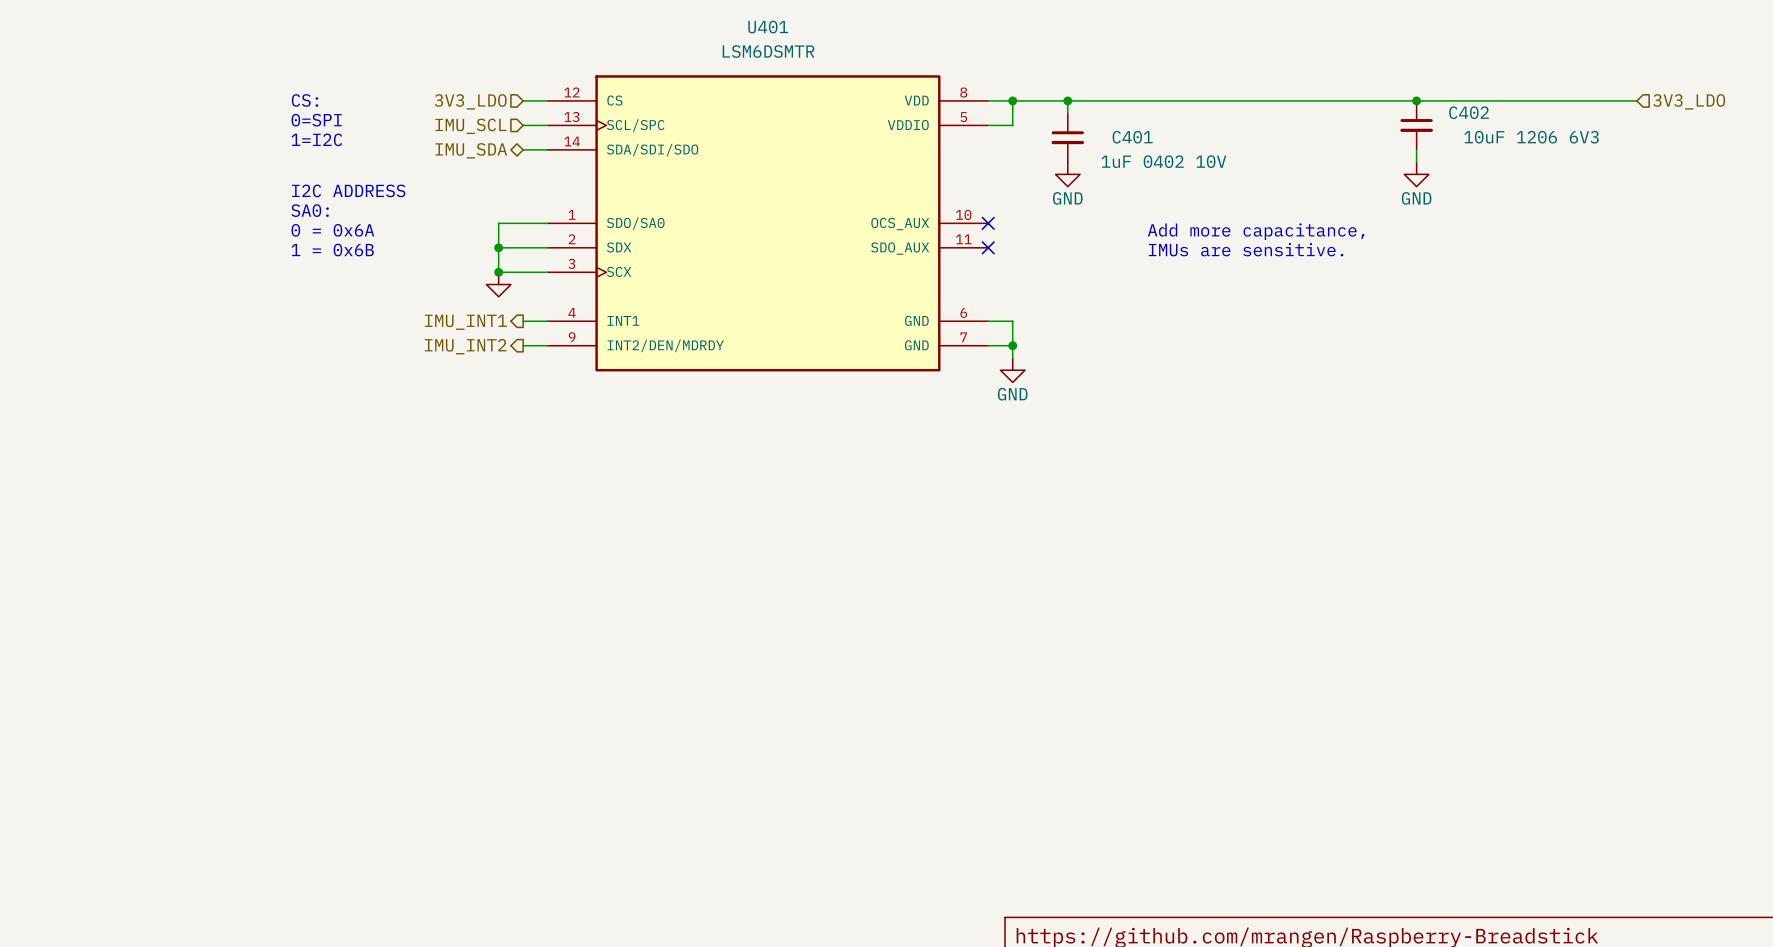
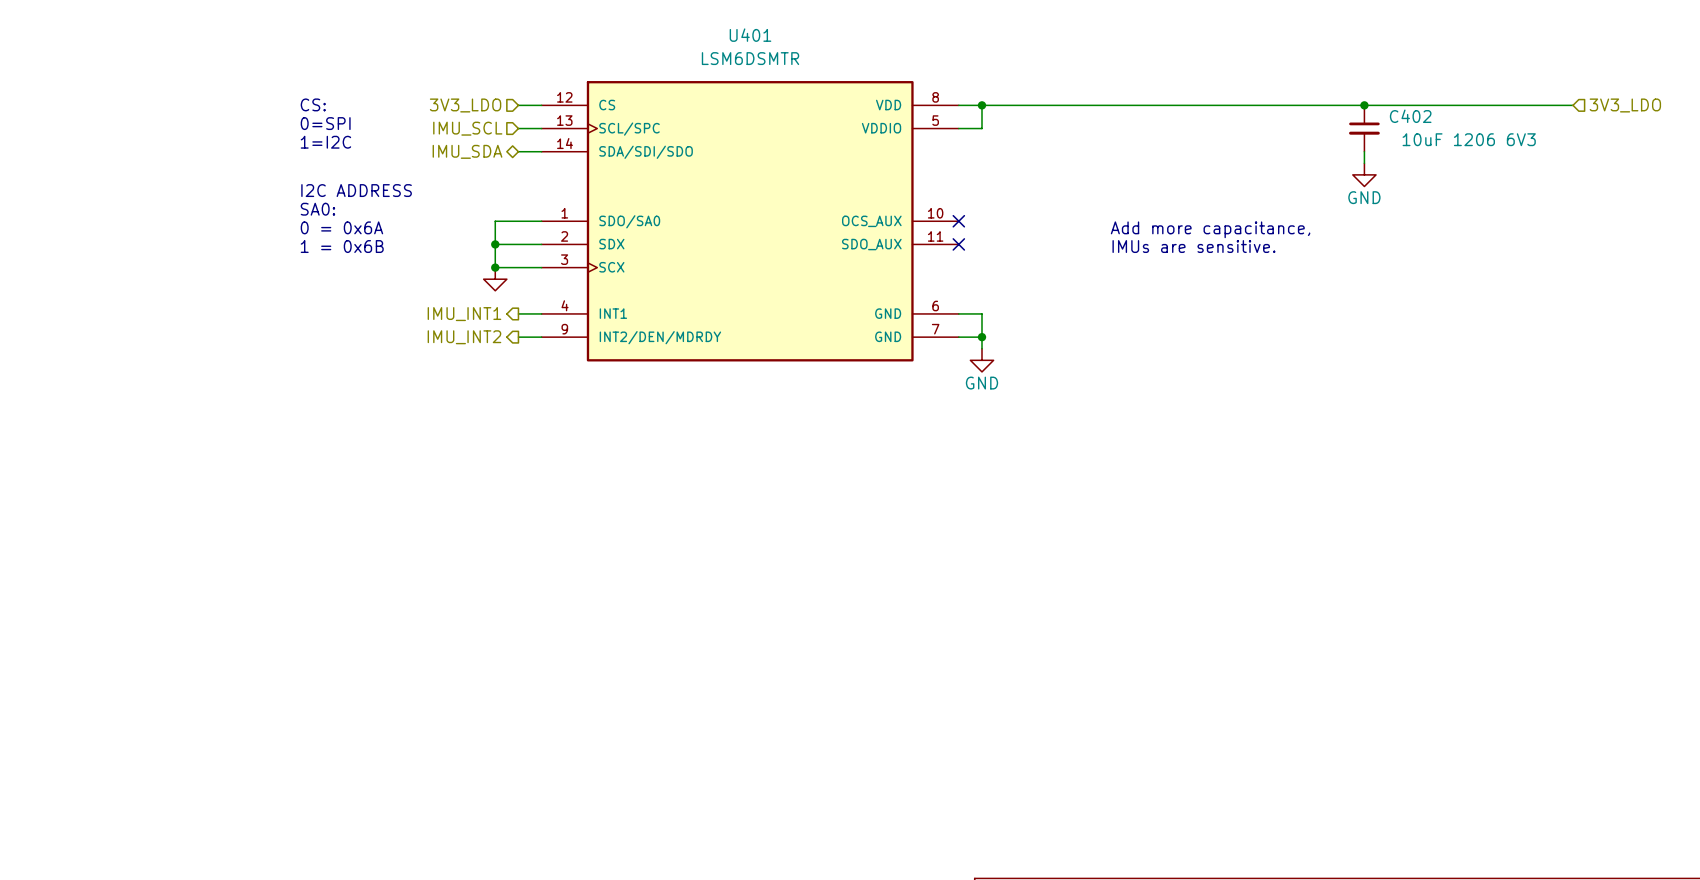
wire: (1067, 100) (1067, 113) -> none
junction: (1067, 100) -> none
C401: 1uF 0402 10V (1067, 137) -> none
power symbol: GND (1067, 174) -> none

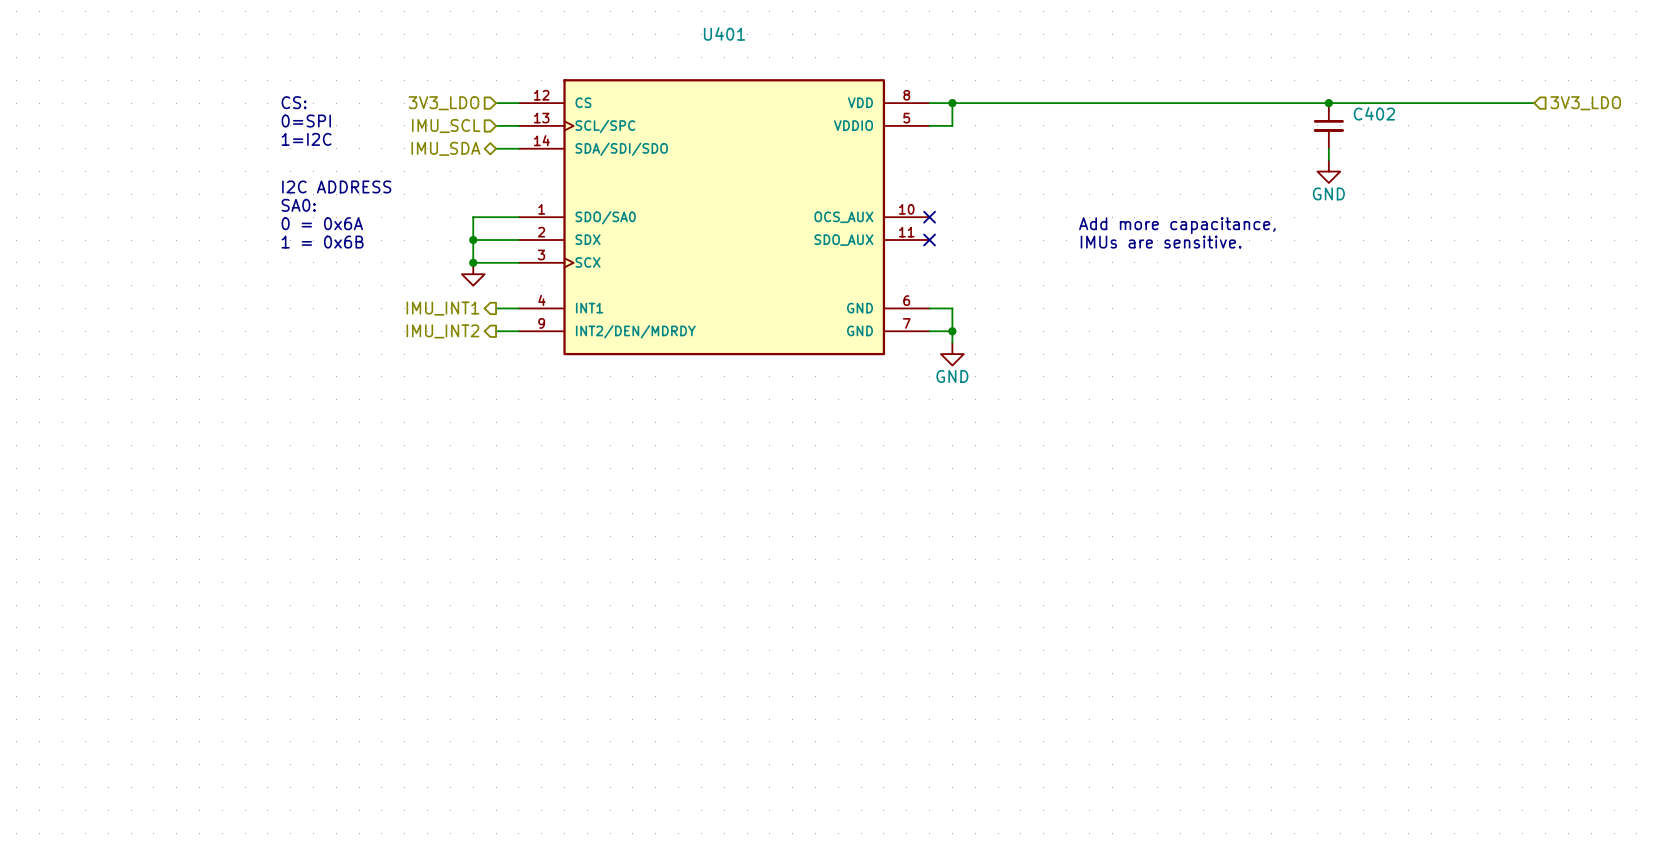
U401 value: LSM6DSMTR (750, 58) -> none
C402 value: 10uF 1206 6V3 (1469, 139) -> none

